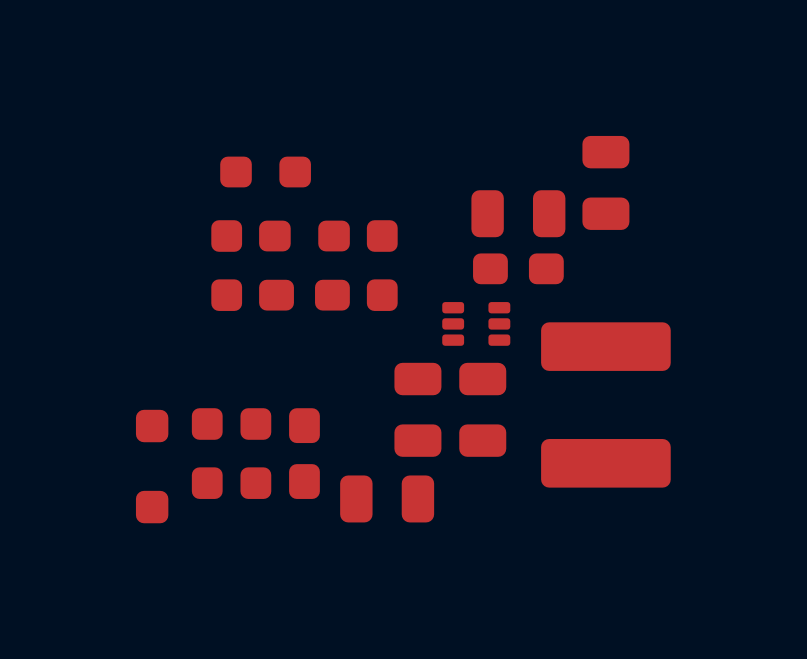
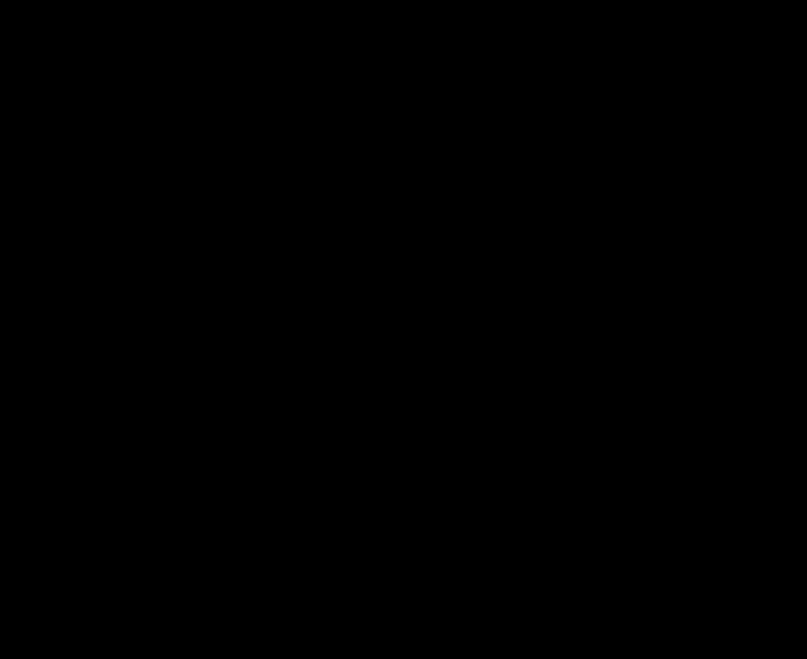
part: (265, 172) -> none
part: (605, 182) -> none
part: (518, 213) -> none
part: (304, 236) -> none
part: (226, 265) -> none
part: (382, 265) -> none
part: (518, 268) -> none
part: (304, 295) -> none
part: (476, 323) -> none
part: (605, 404) -> none
part: (417, 409) -> none
part: (482, 409) -> none
part: (207, 453) -> none
part: (255, 453) -> none
part: (304, 453) -> none
part: (152, 466) -> none
part: (387, 498) -> none

